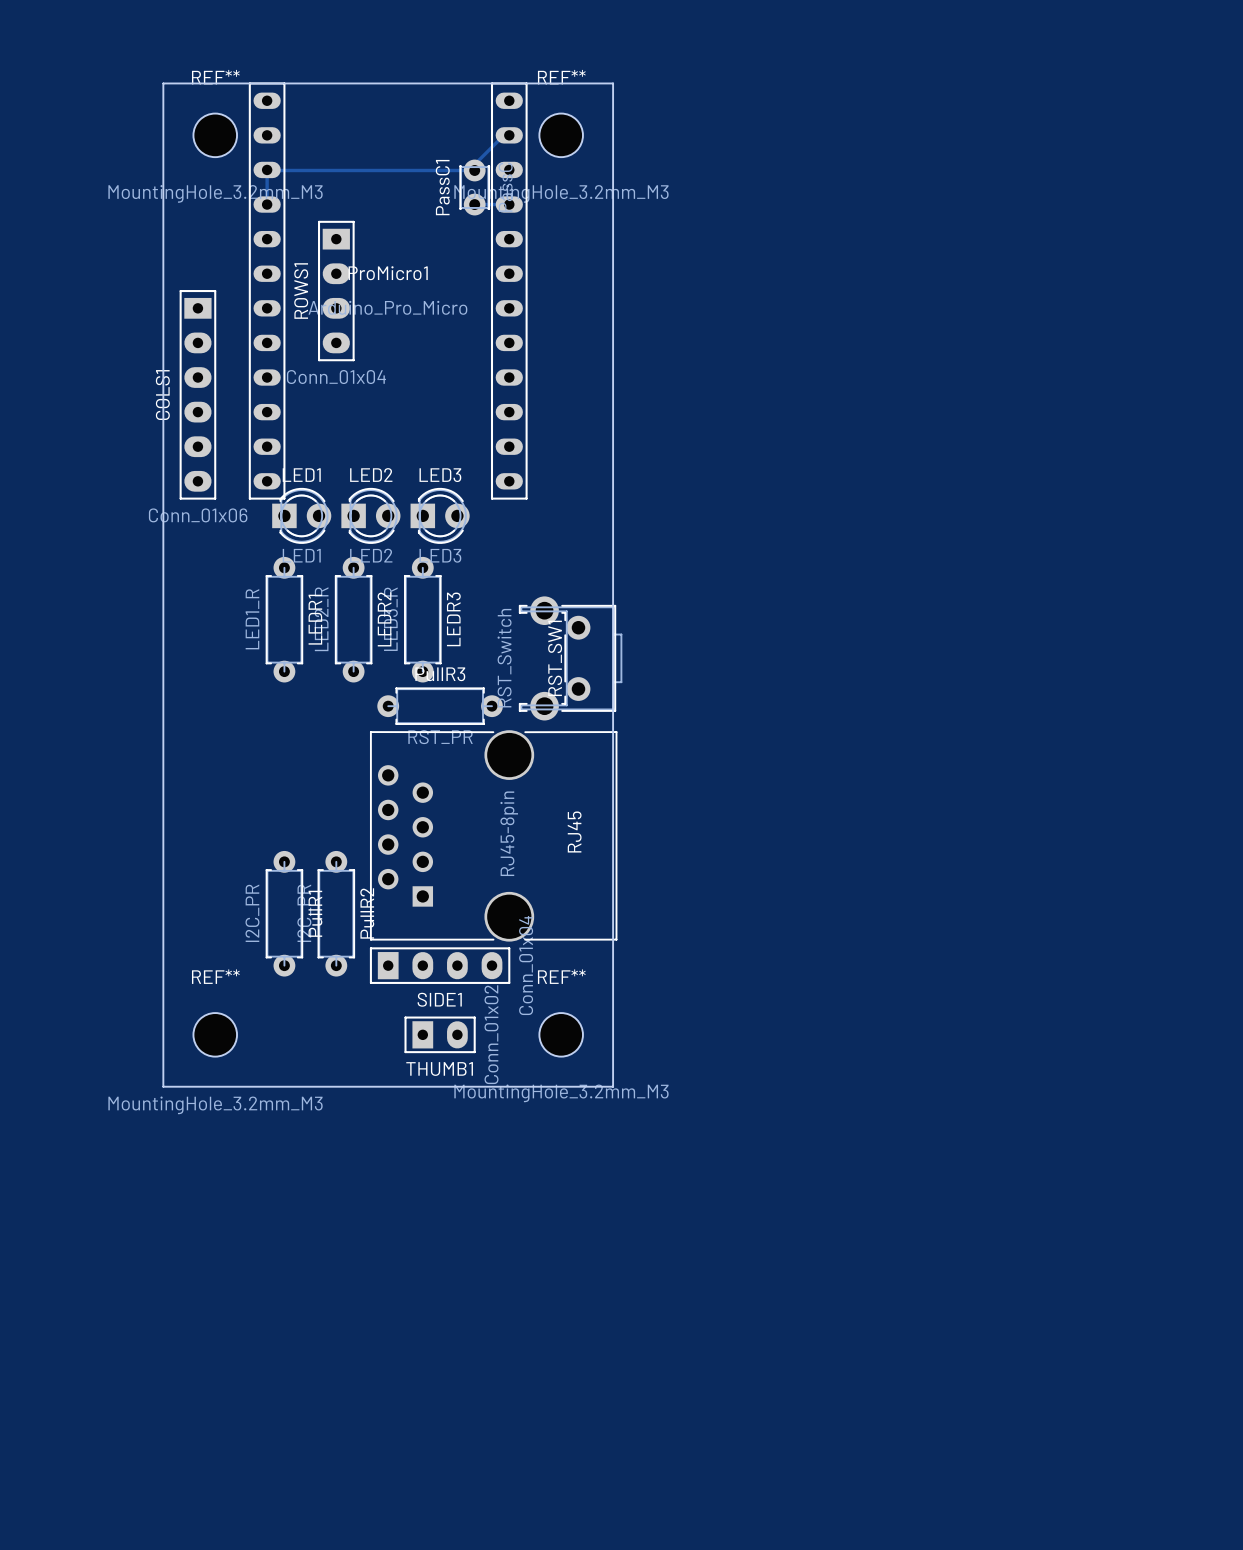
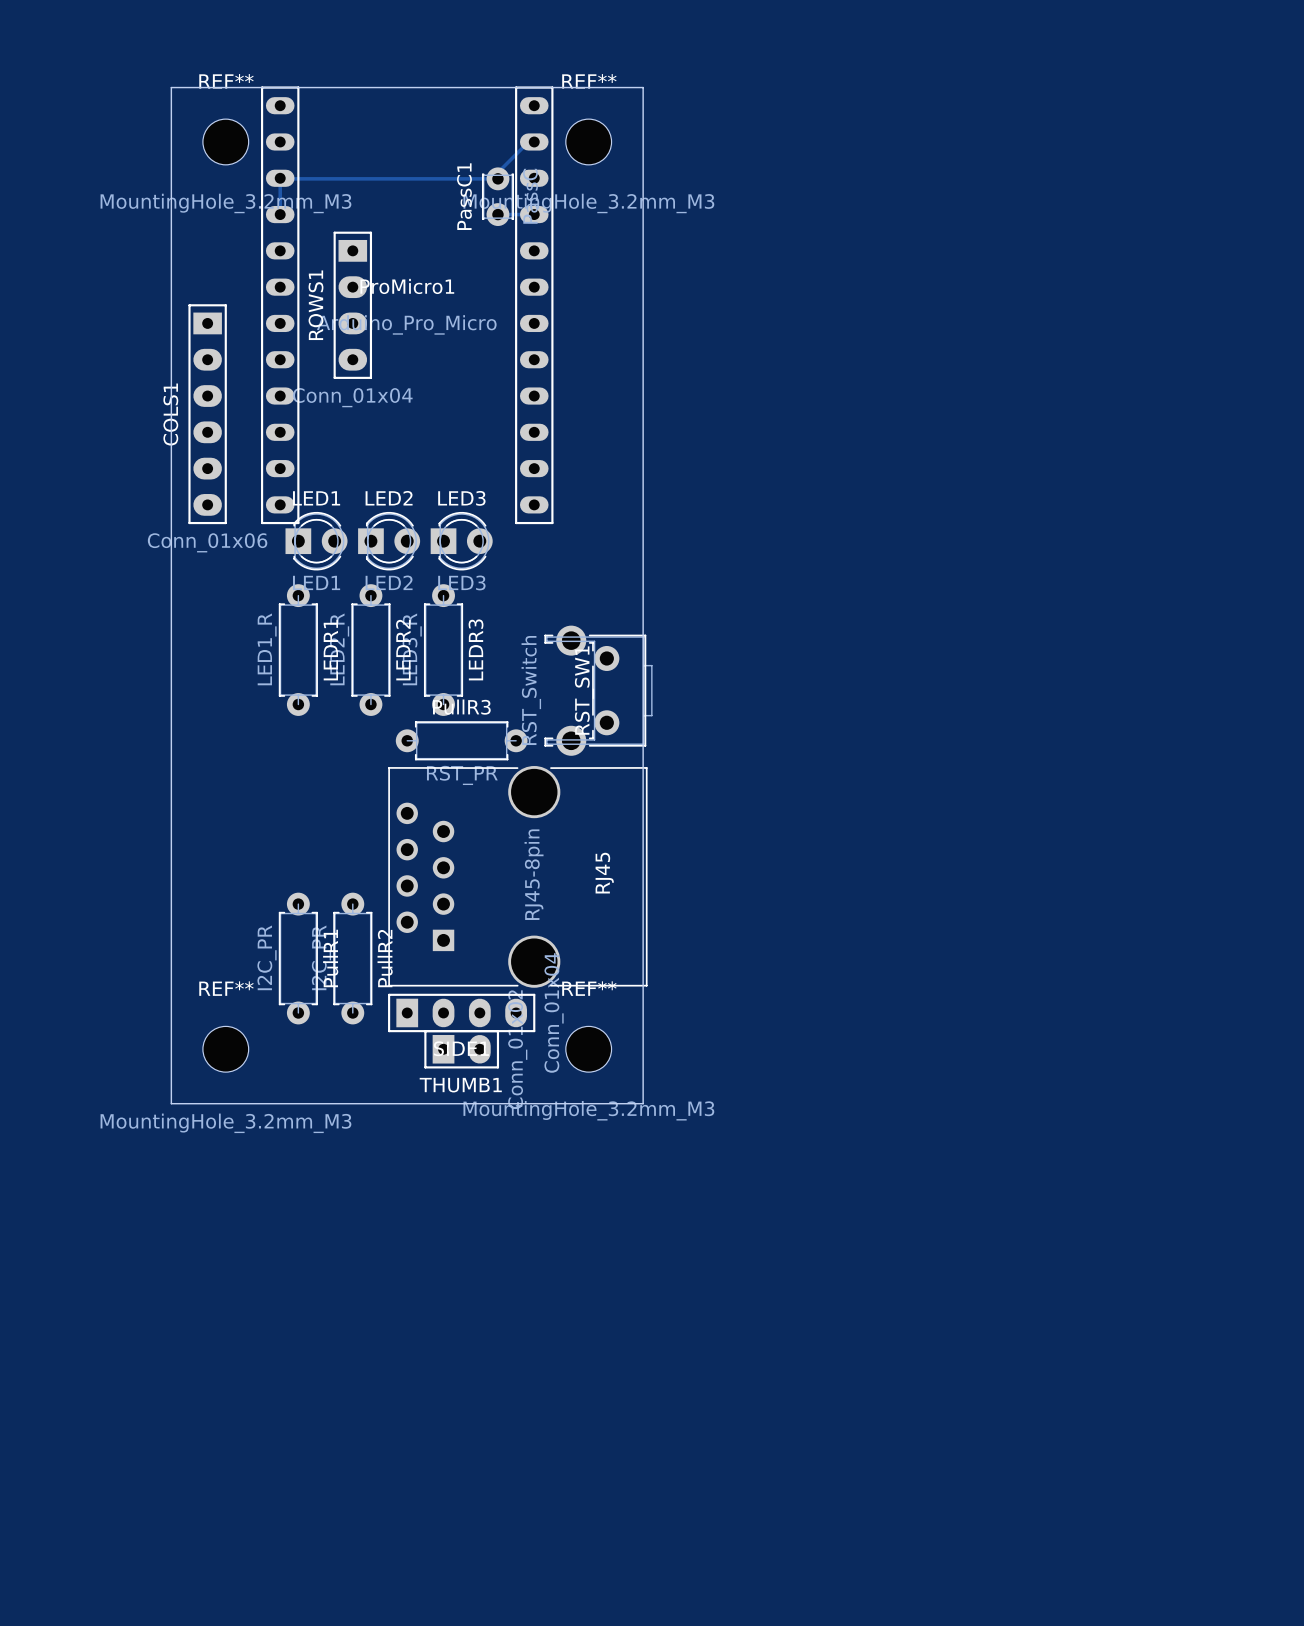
REF** position: (215, 1034) -> (225, 1049)
THUMB1 position: (440, 1034) -> (461, 1049)
REF** position: (561, 1034) -> (588, 1049)
board edge: (163, 1052) (163, 1086) (613, 1086) (613, 1052) -> (171, 1103) (643, 1103)

